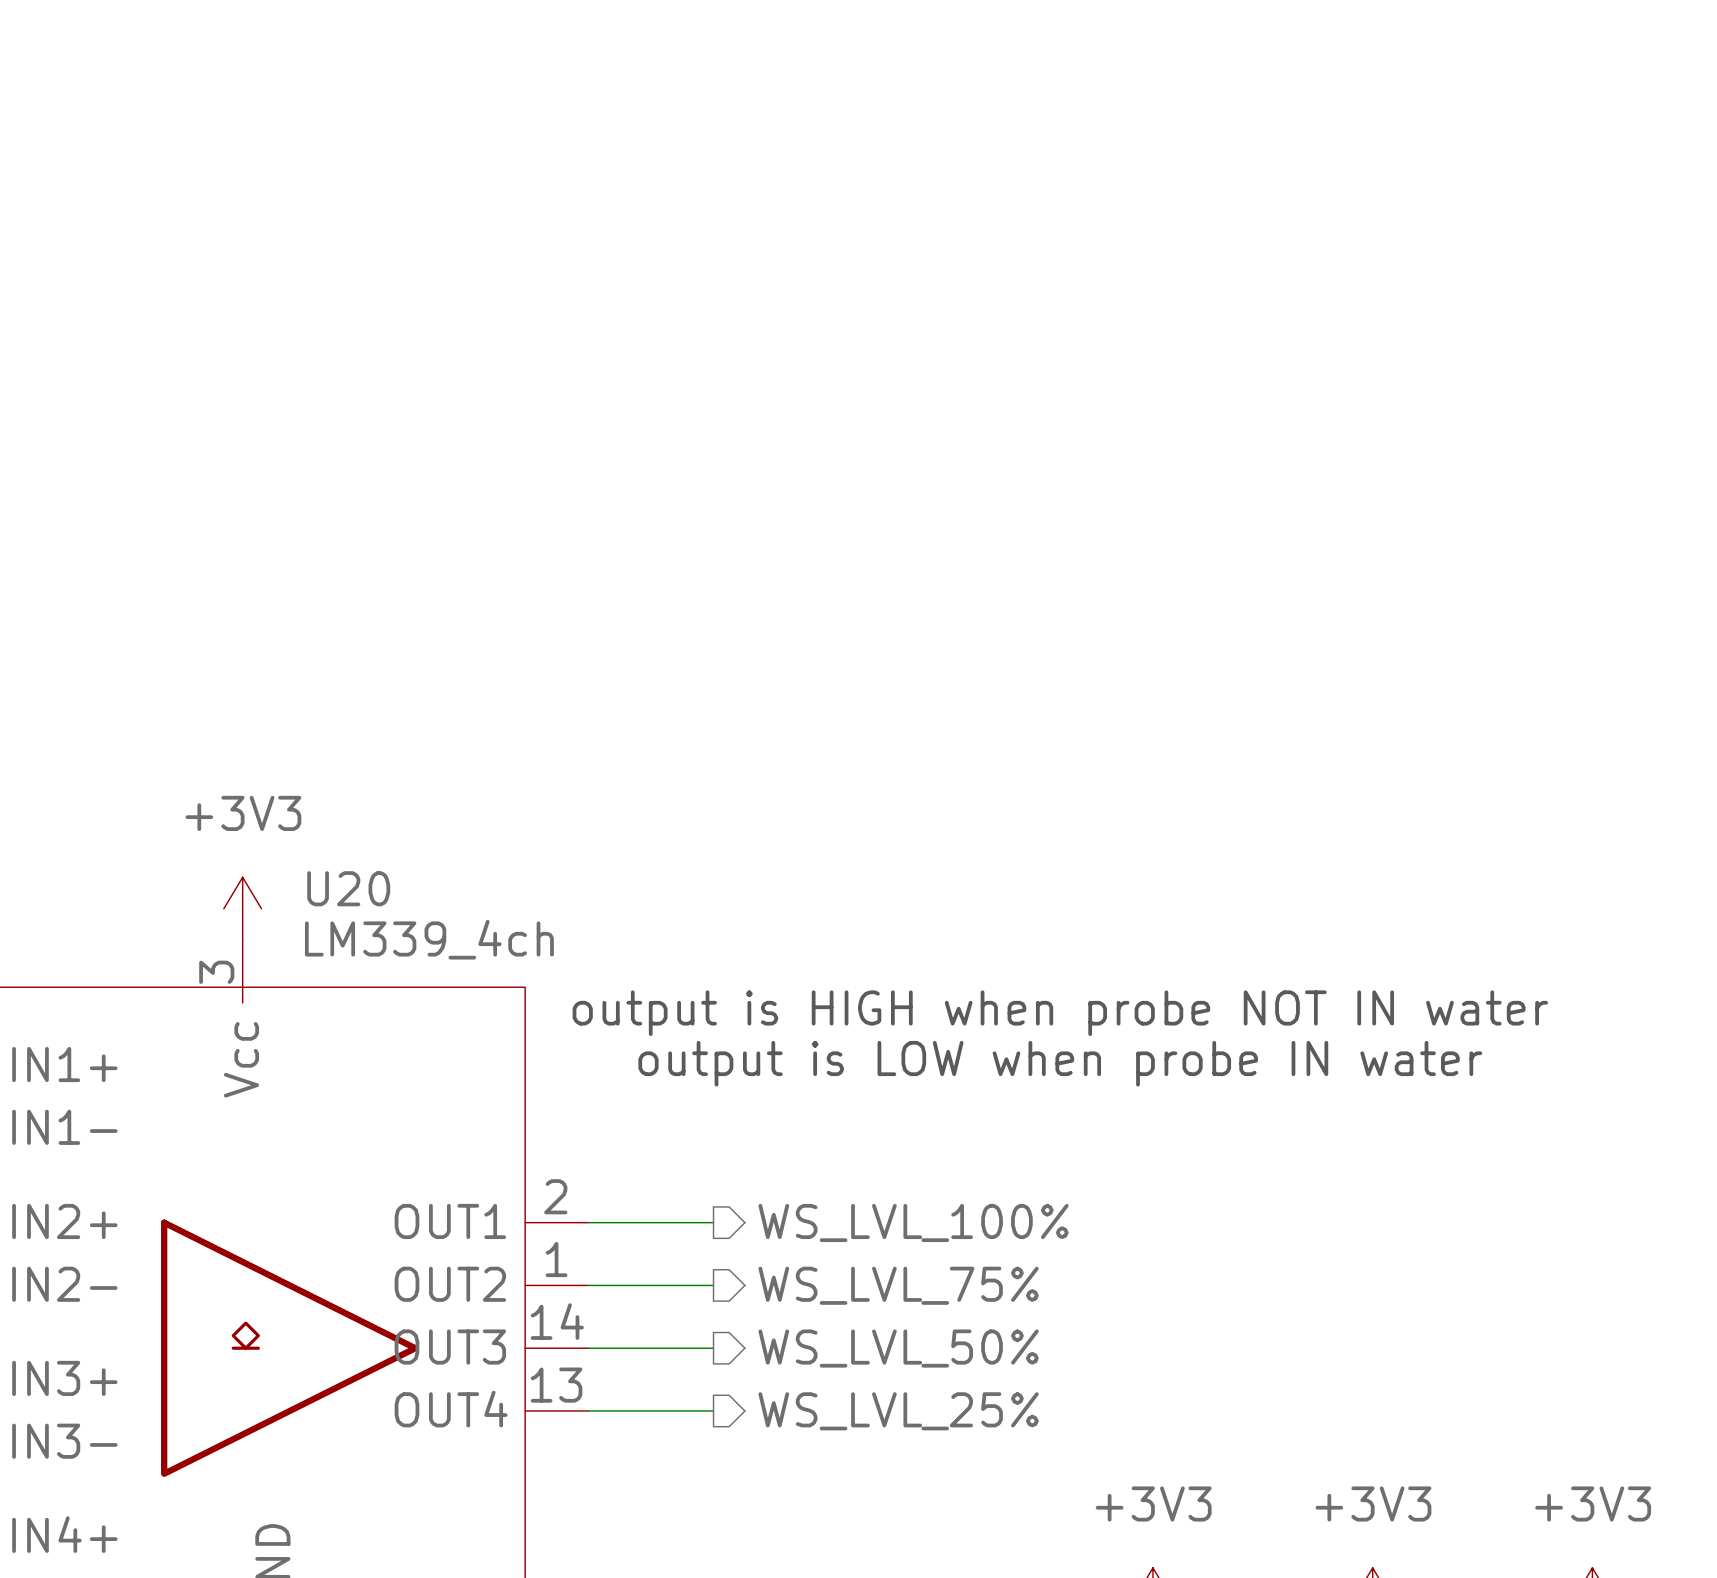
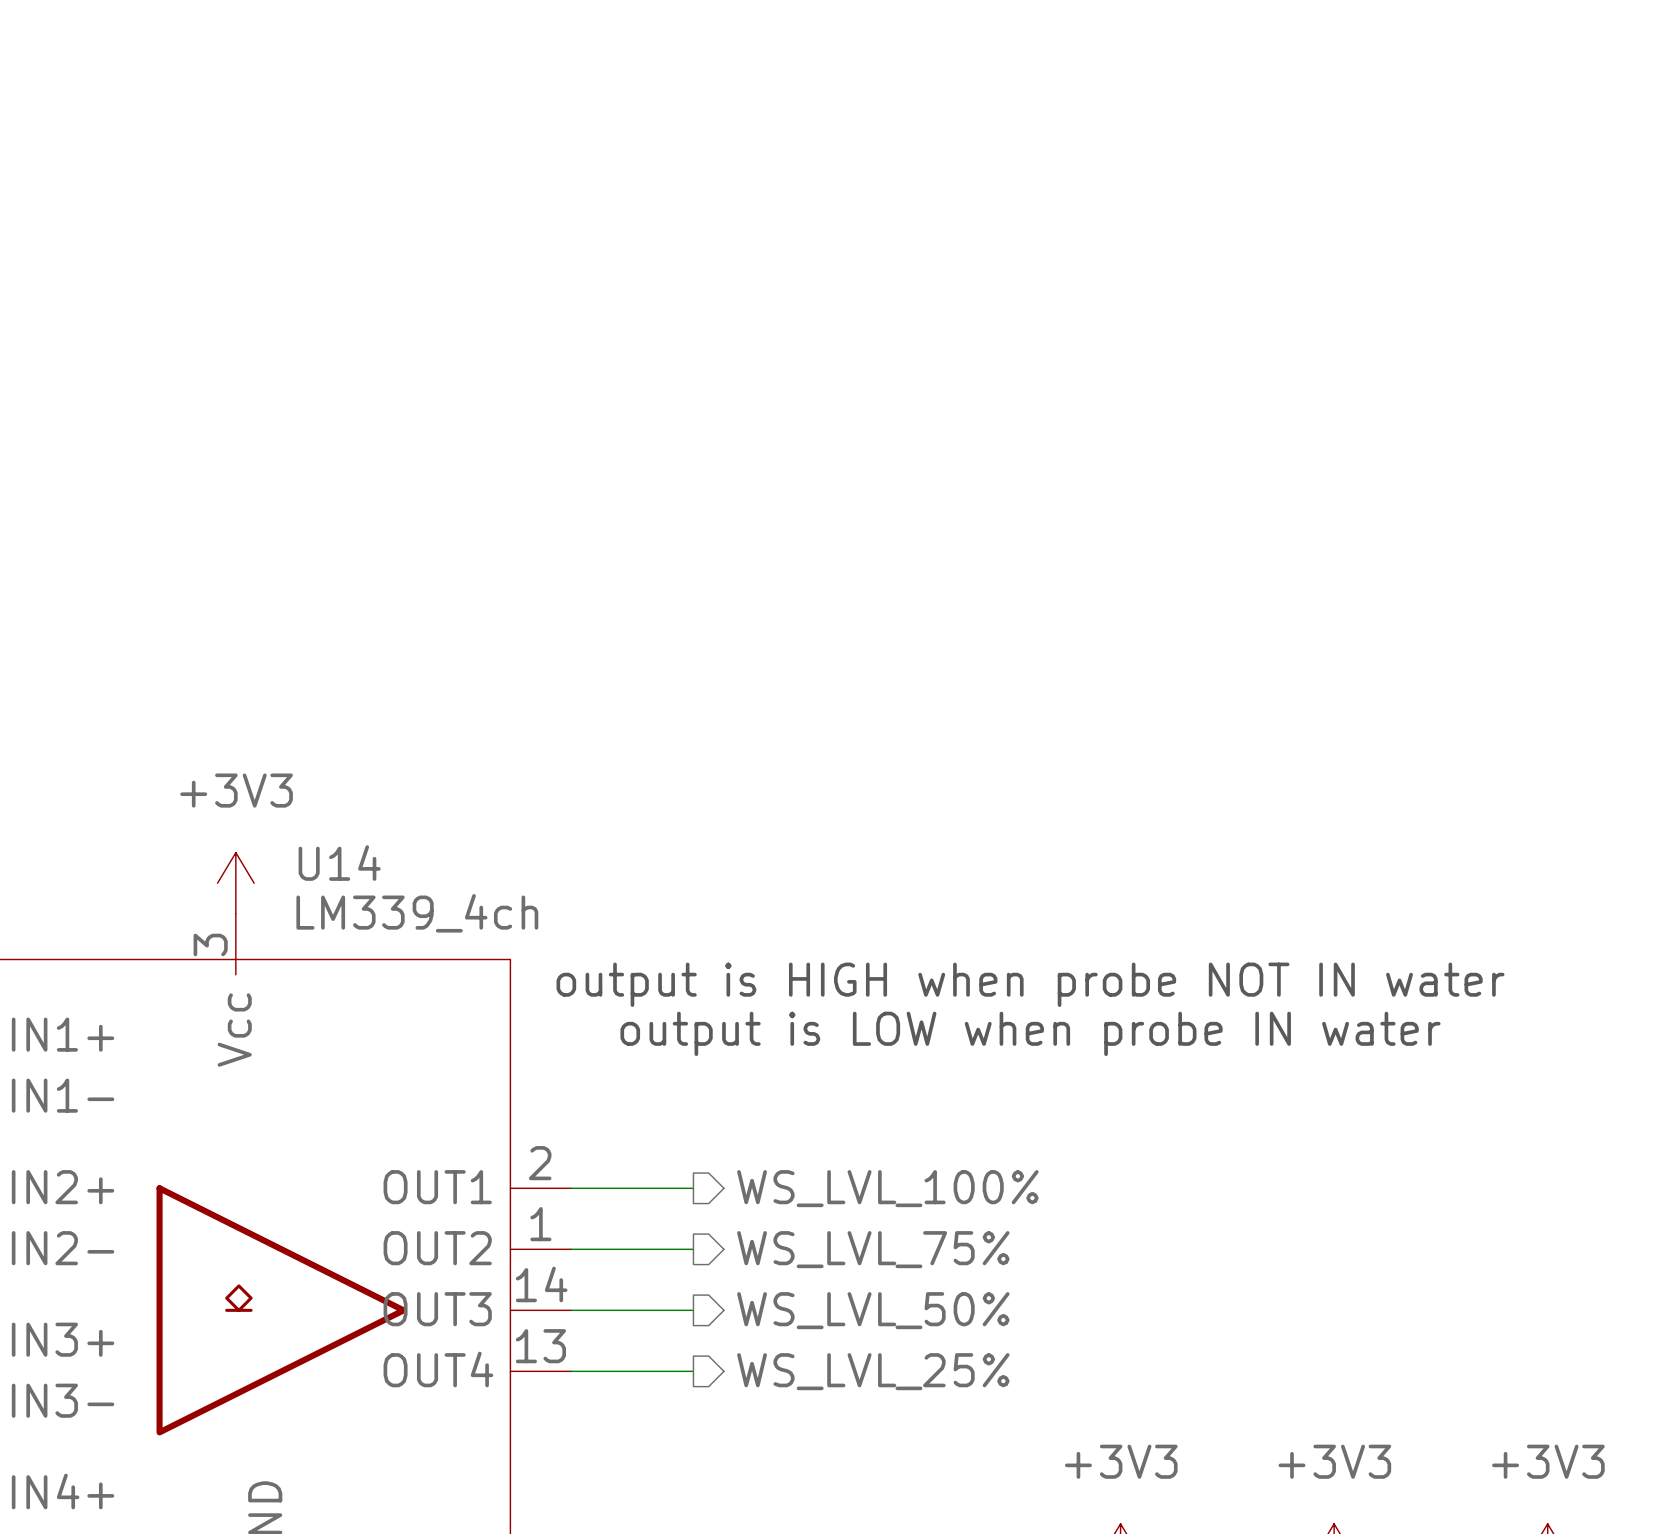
U20 name: U20 (348, 888) -> U14 (339, 863)

